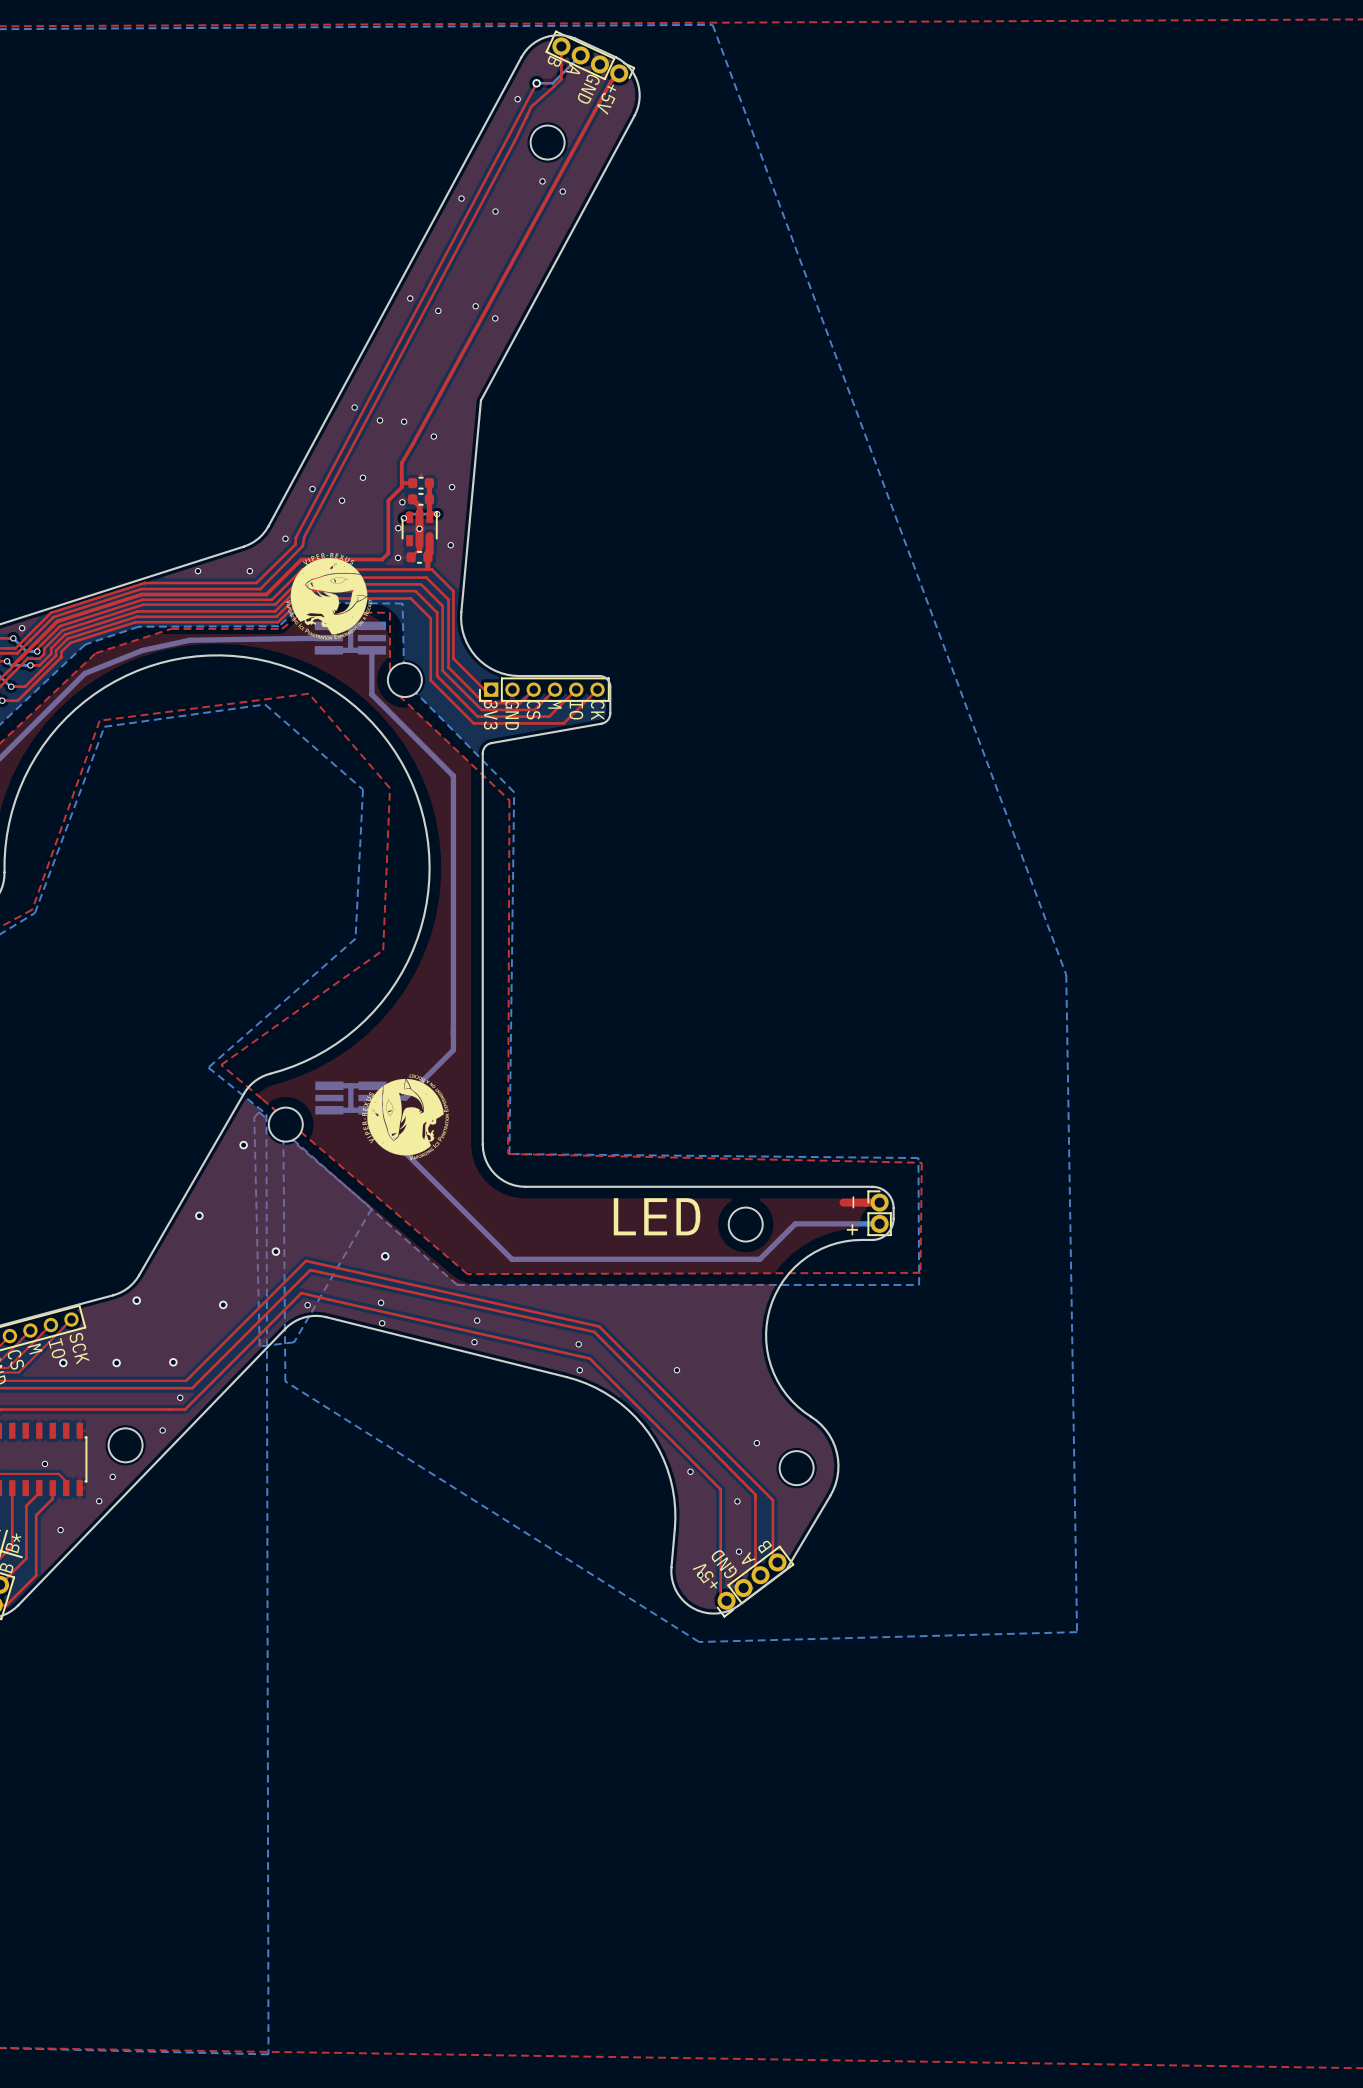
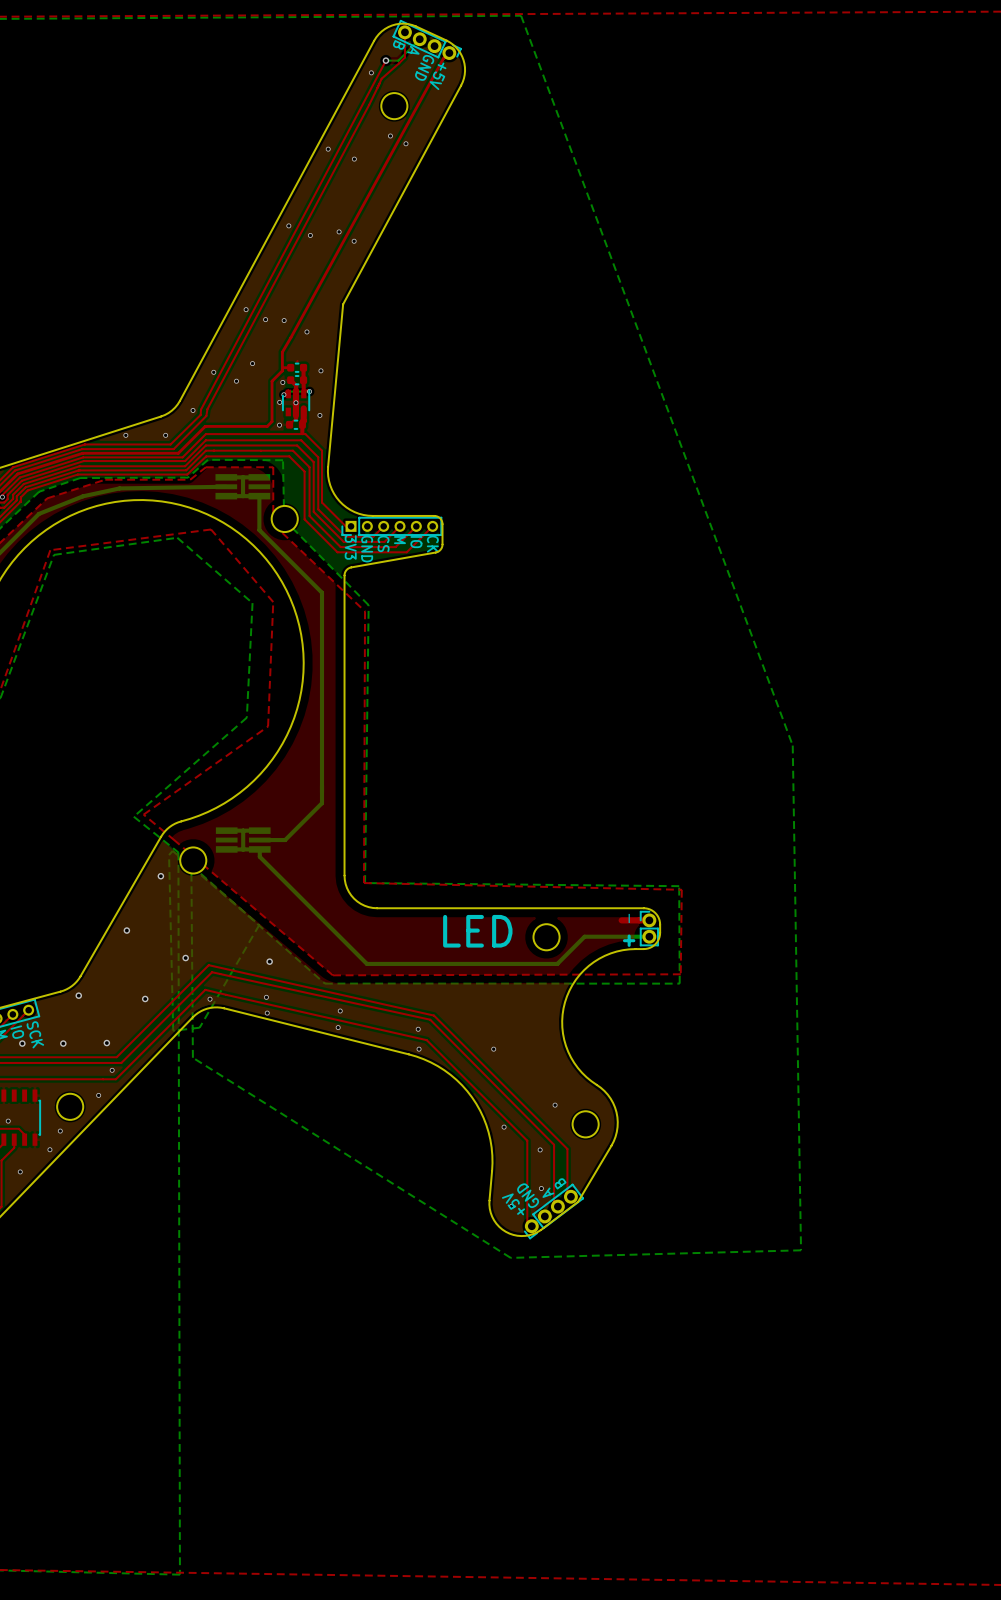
drawing: [286, 552, 373, 640] -> none
drawing: [362, 1074, 449, 1161] -> none

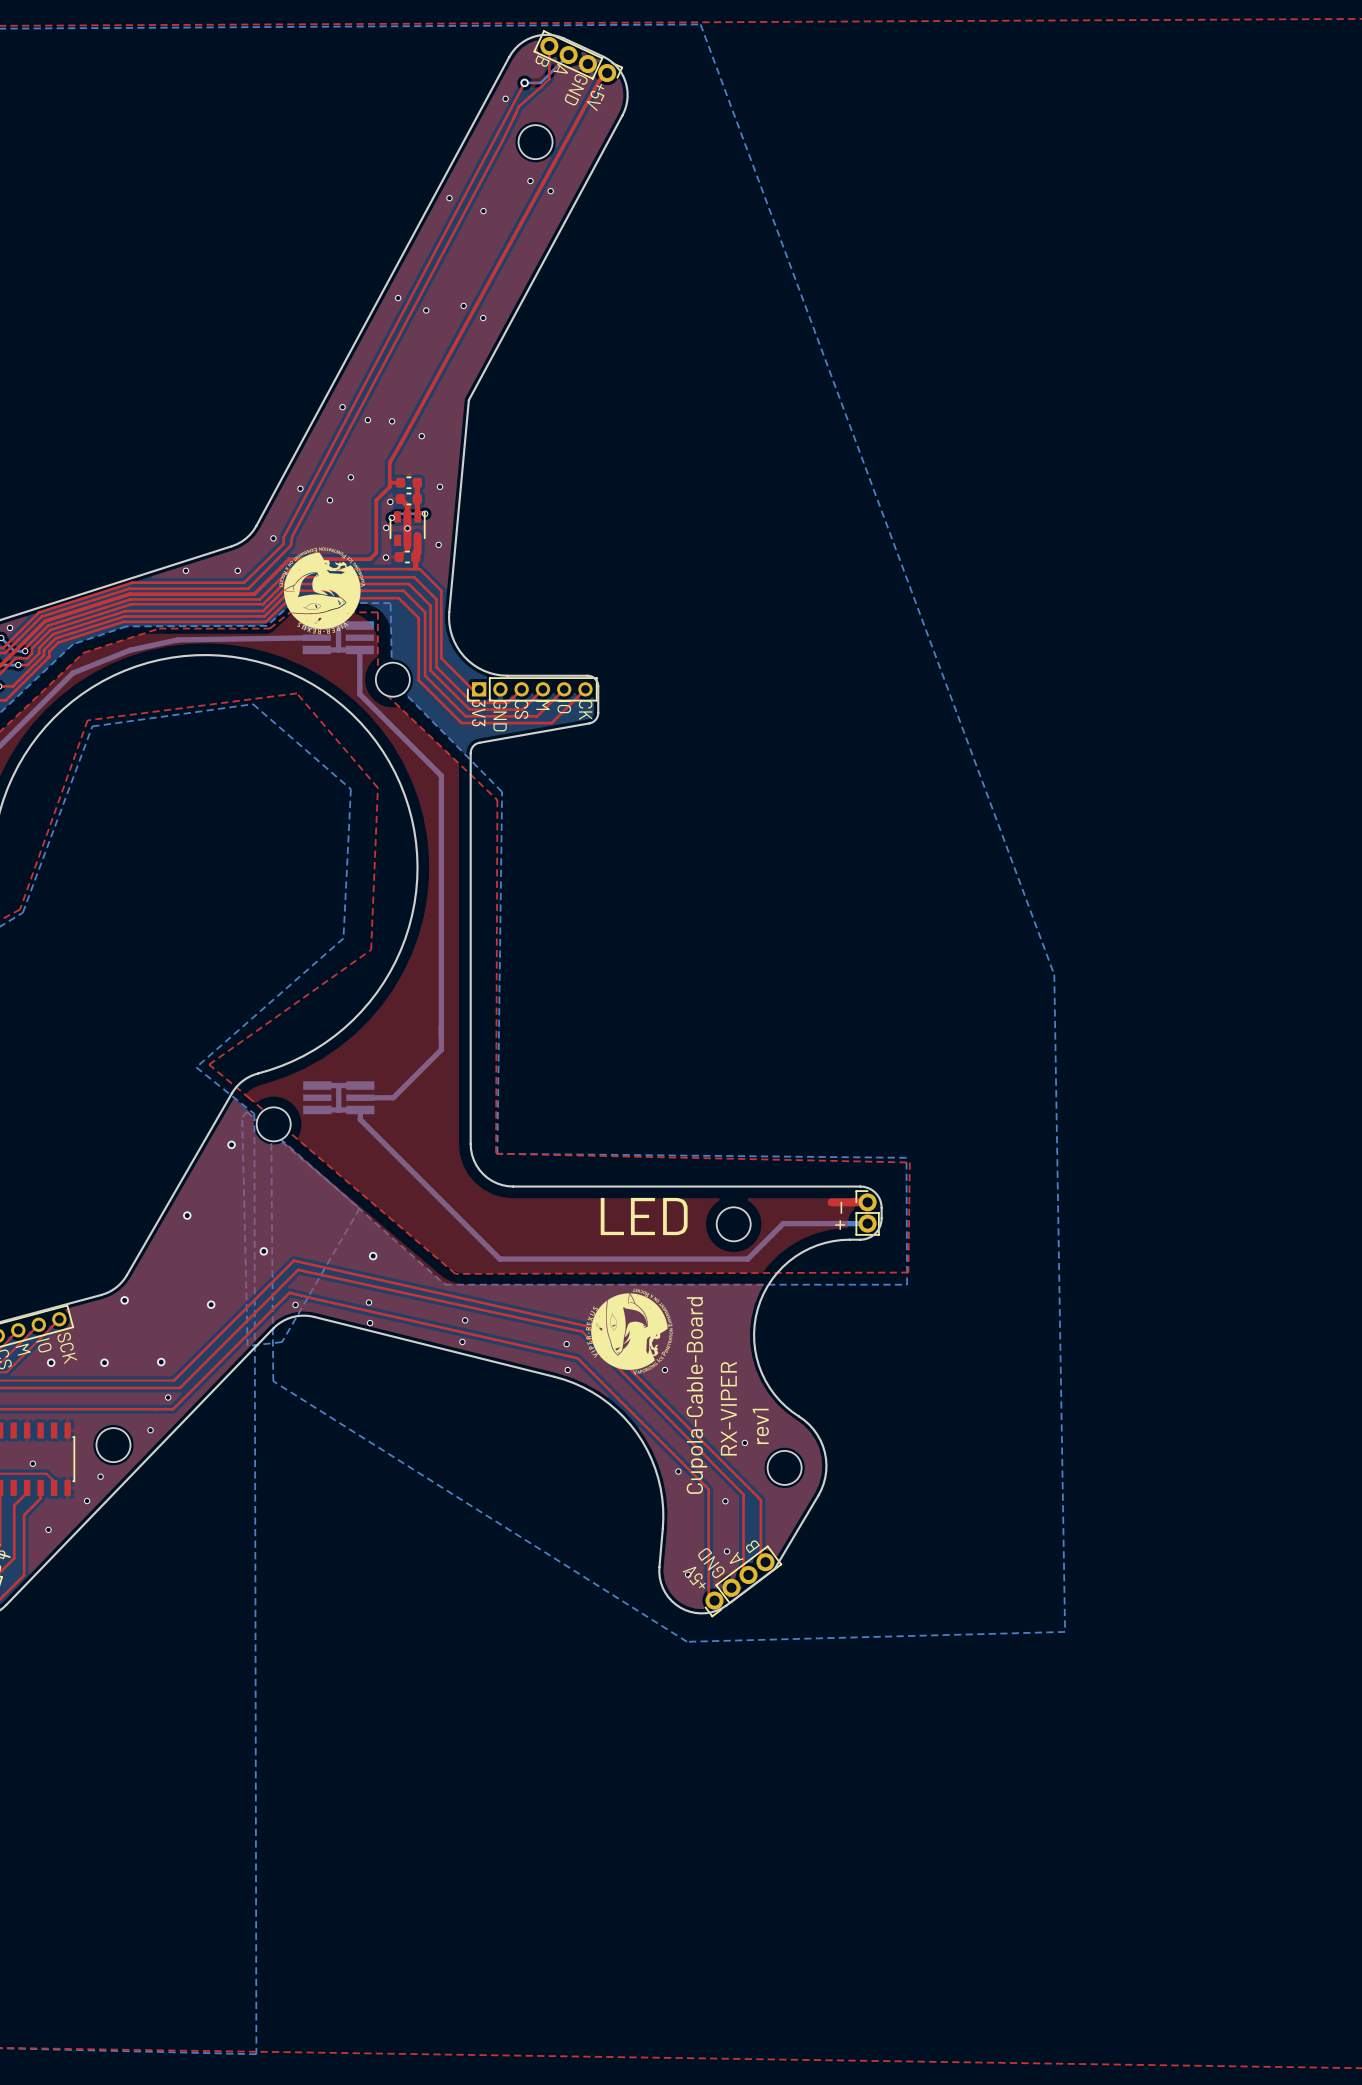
drawing: none -> [279, 547, 366, 635]
drawing: none -> [586, 1288, 673, 1375]
text: none -> Cupola-Cable-Board (696, 1395)
text: none -> RX-VIPER (728, 1408)
text: none -> rev1 (760, 1426)

